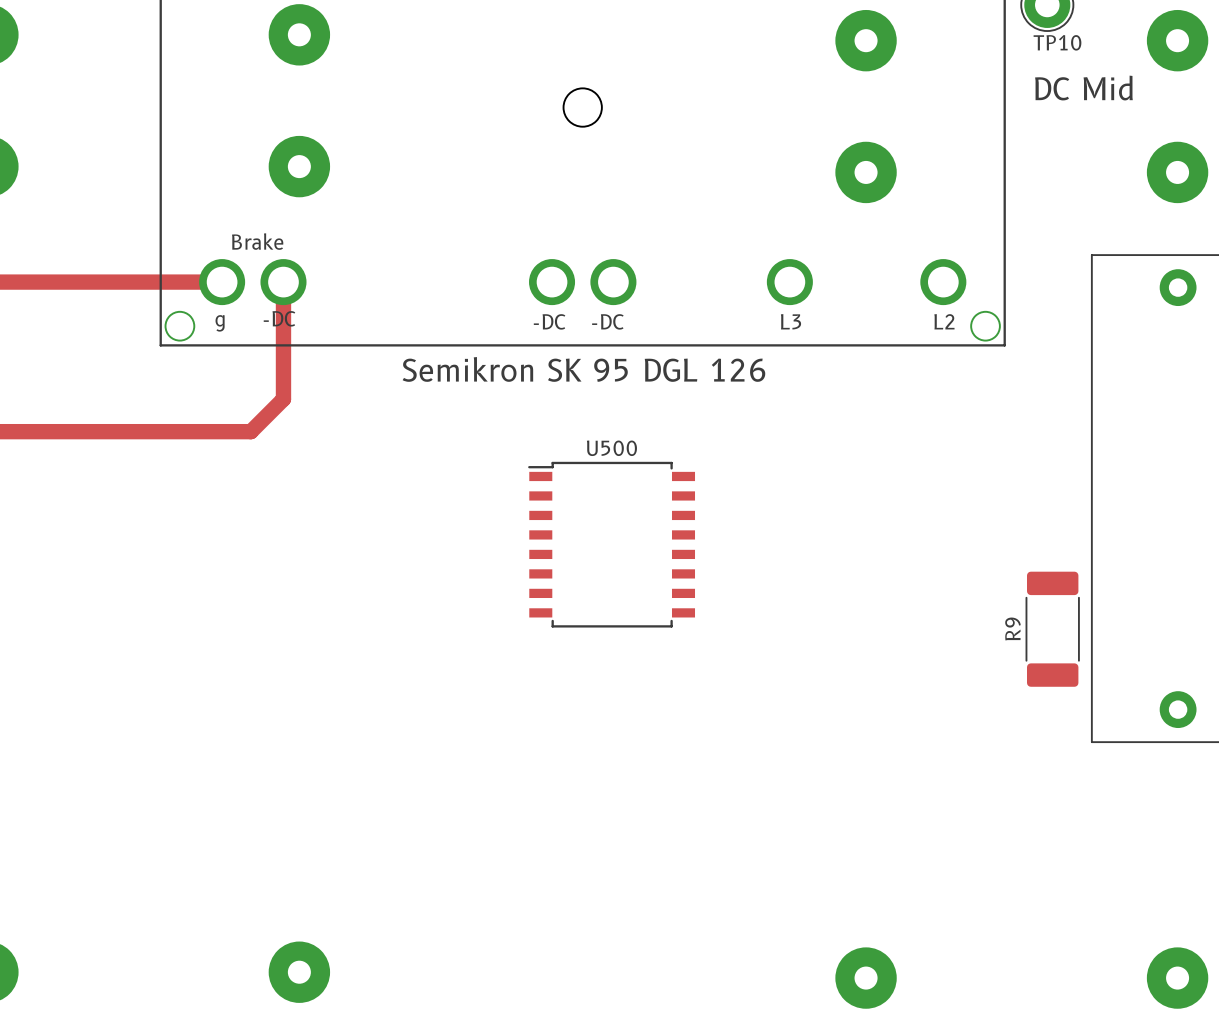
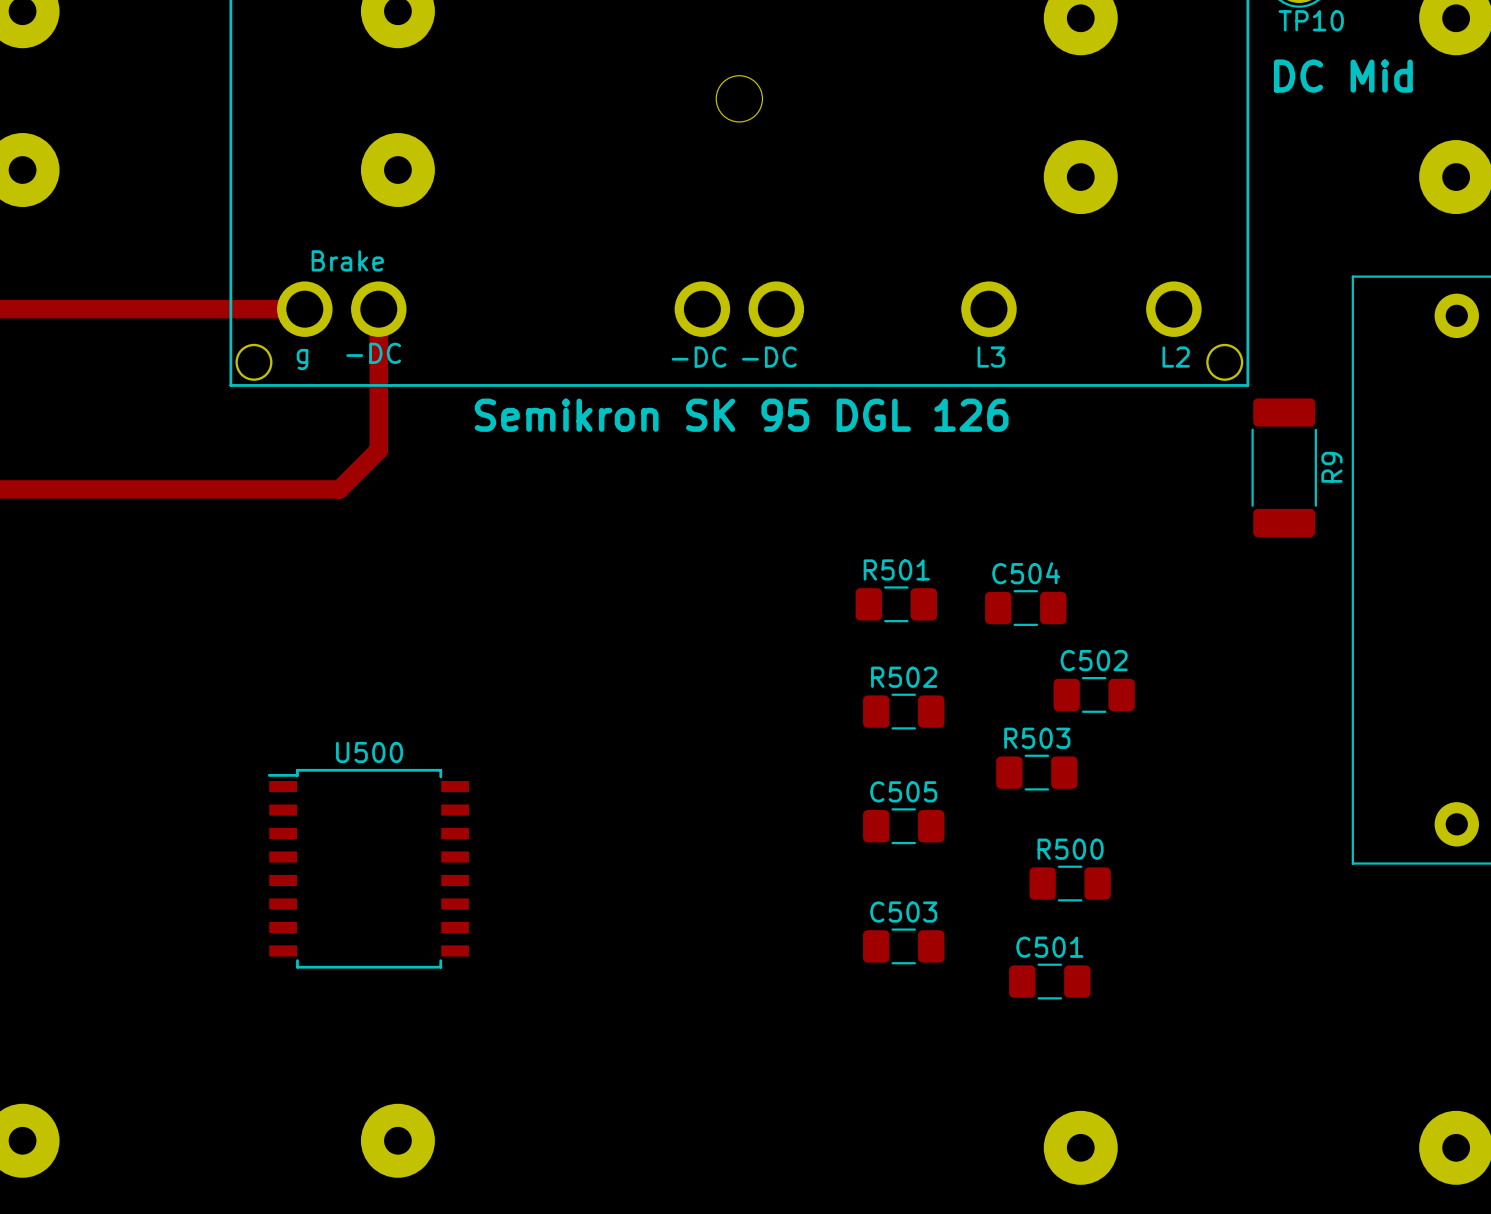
R501: none -> (896, 604)
C504: none -> (1025, 608)
U500 position: (611, 544) -> (368, 868)
C502: none -> (1094, 694)
R502: none -> (903, 711)
R9 name position: R9 (1012, 629) -> R9 (1331, 467)
R9 position: (1052, 629) -> (1284, 467)
R503: none -> (1036, 772)
C505: none -> (903, 826)
R500: none -> (1070, 883)
C503: none -> (903, 946)
C501: none -> (1049, 981)

